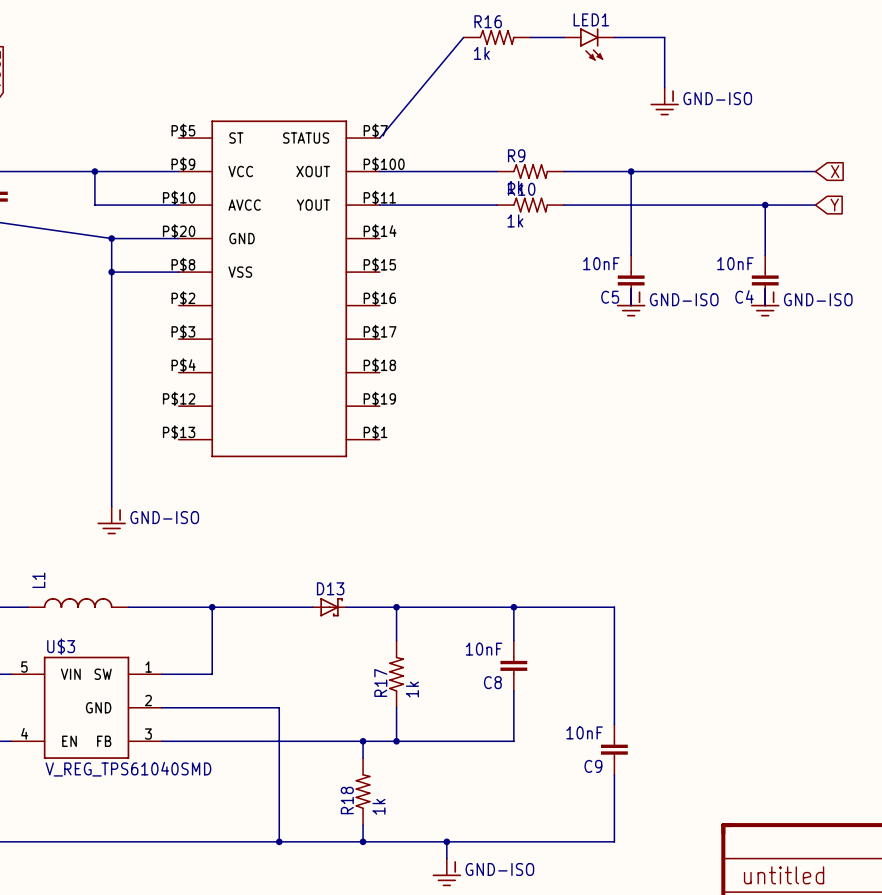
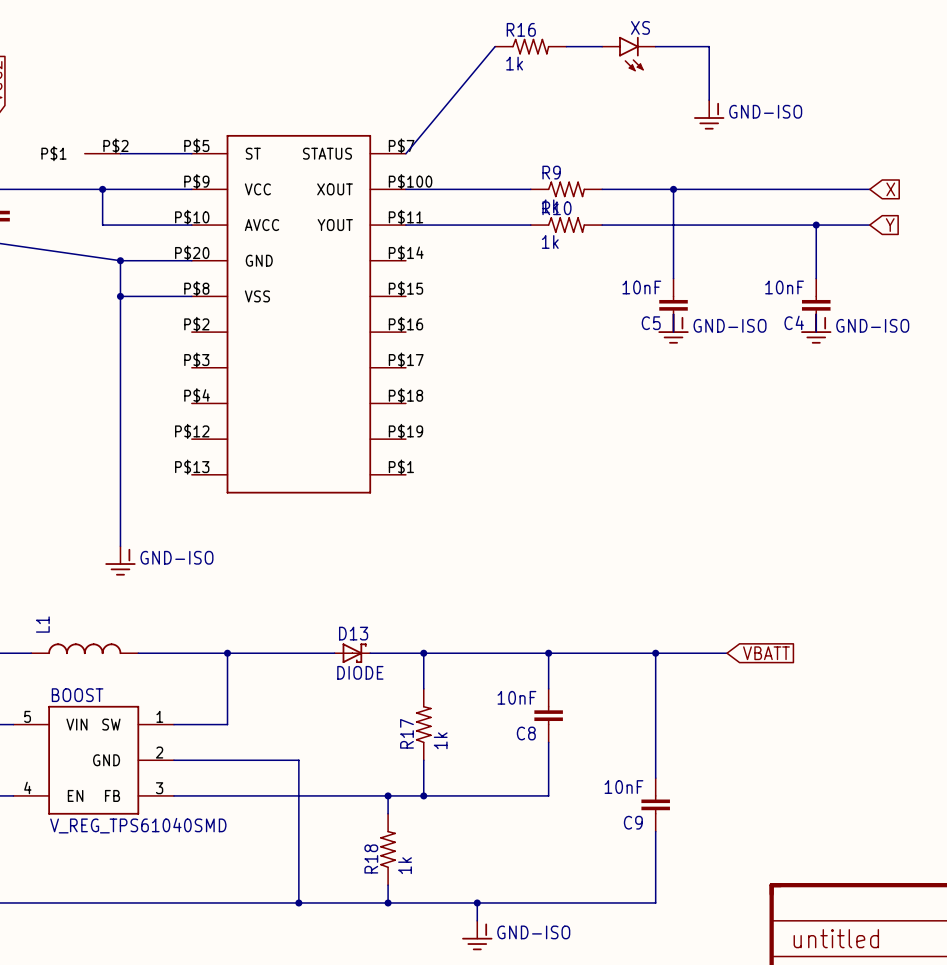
LED1 name: LED1 (591, 19) -> XS (640, 27)
part: none -> (102, 153)
wire: none -> (120, 153) (191, 153)
wire: none -> (655, 653) (727, 653)
junction: none -> (655, 653)
global label: none -> VBATT (766, 653)
D13 value: none -> DIODE (360, 672)
U$3 name: U$3 (61, 646) -> BOOST (77, 695)

